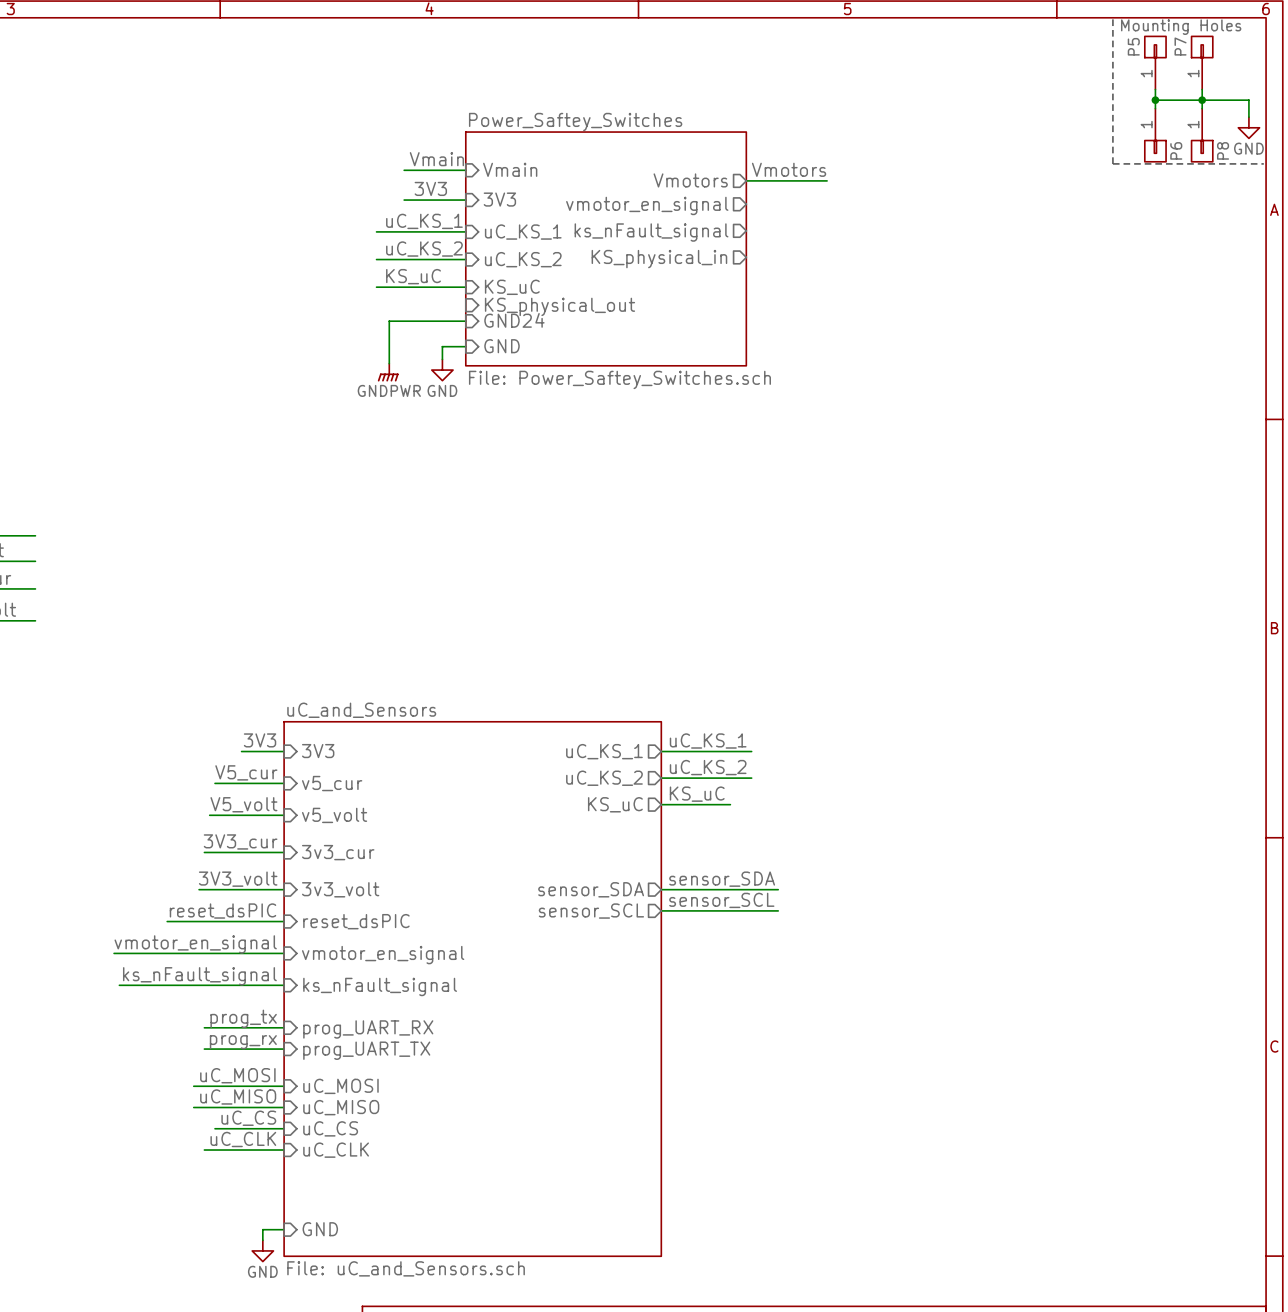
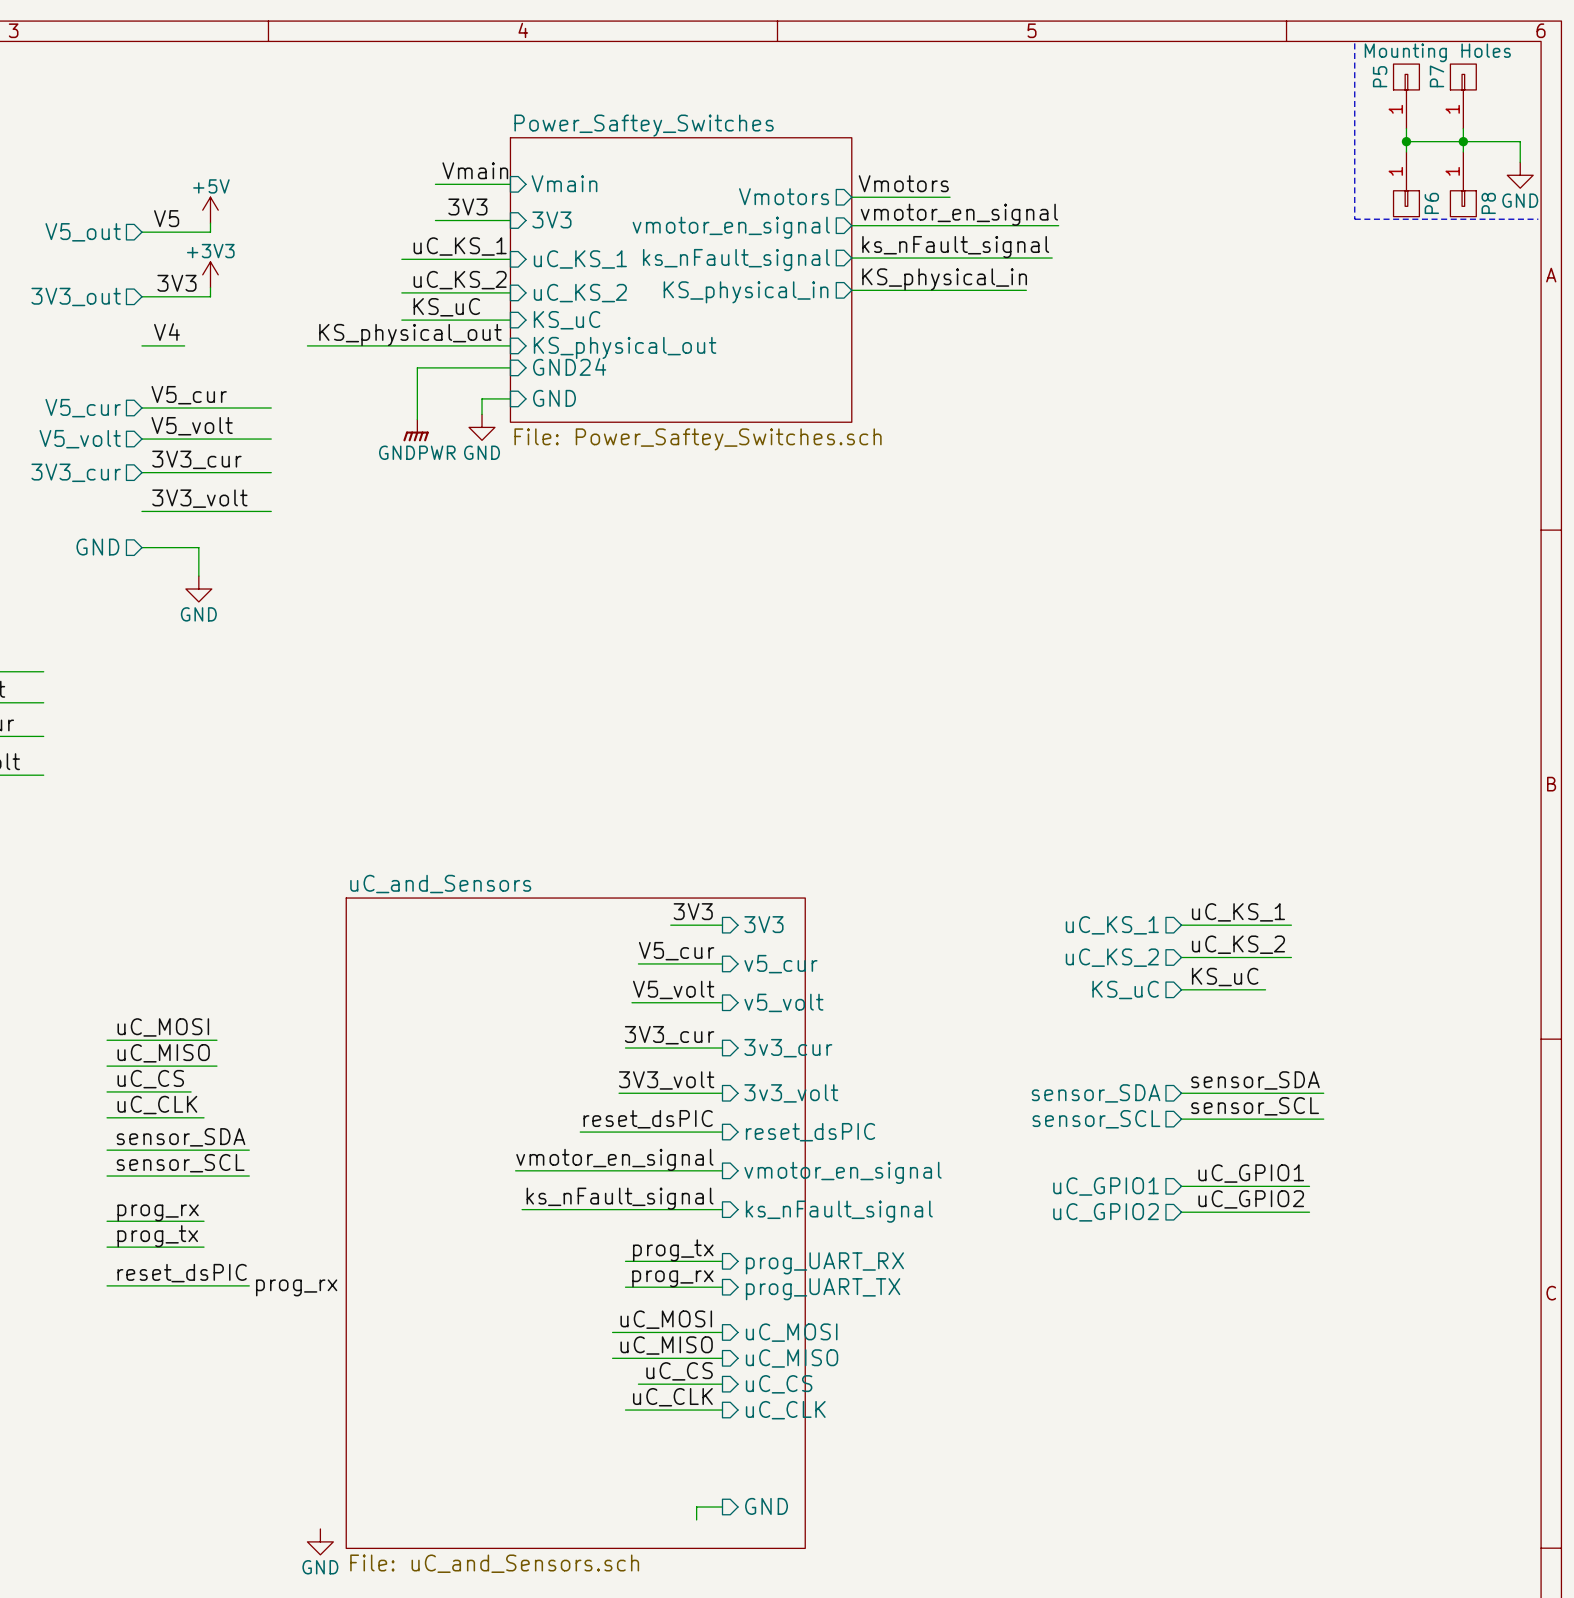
power symbol: none -> +5V (210, 210)
label position: Vmain (436, 159) -> Vmain (475, 170)
label: none -> vmotor_en_signal (959, 214)
label: none -> V5 (166, 218)
wire: none -> (210, 223) (210, 232) (141, 232)
sheet pin position: Vmain (510, 169) -> Vmain (564, 183)
wire: none -> (851, 225) (1058, 225)
label position: Vmotors (789, 169) -> Vmotors (903, 183)
wire: (404, 170) (465, 170) -> (435, 184) (510, 184)
sheet pin: none -> V5_out (83, 232)
sheet pin position: Vmotors (690, 180) -> Vmotors (784, 196)
wire: (746, 180) (827, 180) -> (851, 197) (950, 197)
label: none -> ks_nFault_signal (955, 247)
label position: 3V3 (430, 188) -> 3V3 (467, 206)
wire: none -> (851, 258) (1052, 258)
sheet pin position: 3V3 (499, 199) -> 3V3 (551, 219)
wire: (404, 200) (465, 200) -> (435, 220) (510, 220)
sheet pin position: vmotor_en_signal (647, 205) -> vmotor_en_signal (731, 227)
power symbol: none -> +3V3 (210, 274)
label: none -> KS_physical_in (944, 279)
label: none -> 3V3 (176, 283)
wire: none -> (210, 287) (210, 296) (141, 296)
label position: uC_KS_1 (424, 221) -> uC_KS_1 (460, 246)
wire: none -> (851, 290) (1026, 290)
sheet pin: none -> 3V3_out (76, 296)
wire: (376, 231) (465, 231) -> (401, 259) (510, 259)
sheet pin position: uC_KS_1 (523, 232) -> uC_KS_1 (580, 259)
sheet pin position: ks_nFault_signal (651, 232) -> ks_nFault_signal (736, 260)
sheet Power_Saftey_Switches position: (606, 248) -> (681, 279)
label position: uC_KS_2 (424, 249) -> uC_KS_2 (460, 280)
label: none -> V4 (166, 332)
label: none -> KS_physical_out (410, 334)
wire: (376, 259) (465, 259) -> (401, 292) (510, 292)
sheet pin position: uC_KS_2 (523, 259) -> uC_KS_2 (580, 293)
sheet pin position: KS_physical_in (659, 259) -> KS_physical_in (746, 292)
wire: none -> (141, 345) (184, 345)
wire: none -> (307, 345) (510, 345)
label position: KS_uC (413, 276) -> KS_uC (446, 307)
wire: (376, 287) (465, 287) -> (401, 320) (510, 320)
sheet pin position: KS_uC (512, 287) -> KS_uC (567, 320)
sheet pin position: KS_physical_out (559, 306) -> KS_physical_out (625, 347)
label: none -> V5_cur (189, 395)
sheet pin: none -> V5_cur (83, 408)
wire: none -> (141, 408) (271, 408)
sheet pin position: GND24 (514, 320) -> GND24 (569, 366)
wire: (465, 321) (389, 321) (389, 363) -> (510, 367) (417, 367) (417, 419)
label: none -> V5_volt (192, 426)
sheet pin: none -> V5_volt (80, 439)
wire: none -> (141, 439) (271, 439)
wire: (465, 346) (442, 346) (442, 359) -> (510, 398) (482, 398) (482, 414)
sheet pin position: GND (502, 346) -> GND (554, 398)
label: none -> 3V3_cur (196, 459)
power symbol position: GND (442, 370) -> GND (482, 427)
sheet pin: none -> 3V3_cur (76, 472)
wire: none -> (141, 472) (271, 472)
power symbol position: GNDPWR (388, 372) -> GNDPWR (416, 430)
label: none -> 3V3_volt (199, 498)
wire: none -> (141, 511) (271, 511)
sheet pin: none -> GND (97, 547)
wire: none -> (141, 547) (198, 547) (198, 576)
power symbol: none -> GND (198, 589)
label: none -> 3V3 (693, 911)
label: none -> uC_KS_1 (1238, 912)
label: 3V3 (260, 740) -> none
label: uC_KS_1 (708, 741) -> none
sheet pin: none -> 3V3 (763, 924)
wire: none -> (670, 925) (722, 925)
sheet pin: none -> uC_KS_1 (1112, 925)
wire: none -> (1181, 925) (1291, 925)
wire: (241, 751) (284, 751) -> none
sheet pin: 3V3 (318, 751) -> none
sheet pin: uC_KS_1 (604, 751) -> none
wire: (661, 751) (751, 751) -> none
label: none -> uC_KS_2 (1238, 944)
label: none -> V5_cur (676, 951)
label: uC_KS_2 (708, 767) -> none
sheet pin: none -> uC_KS_2 (1112, 957)
wire: none -> (1181, 957) (1291, 957)
label: V5_cur (246, 772) -> none
sheet pin: none -> v5_cur (780, 964)
sheet pin: uC_KS_2 (604, 778) -> none
wire: (661, 778) (751, 778) -> none
wire: (215, 783) (284, 783) -> (107, 1091) (191, 1091)
sheet pin: v5_cur (332, 783) -> none
label: none -> KS_uC (1225, 977)
label: KS_uC (697, 794) -> none
label: none -> V5_volt (673, 989)
sheet pin: none -> KS_uC (1125, 989)
wire: none -> (1181, 989) (1265, 989)
label: V5_volt (243, 804) -> none
sheet pin: KS_uC (615, 804) -> none
wire: (661, 804) (730, 804) -> (638, 963) (722, 963)
wire: none -> (631, 1002) (722, 1002)
sheet pin: none -> v5_volt (783, 1002)
wire: (209, 815) (284, 815) -> none
sheet pin: v5_volt (334, 815) -> none
label: none -> uC_MOSI (163, 1027)
label: none -> 3V3_cur (669, 1035)
wire: none -> (107, 1040) (216, 1040)
label: 3V3_cur (240, 841) -> none
wire: none -> (625, 1048) (722, 1048)
sheet pin: none -> 3v3_cur (788, 1048)
label: none -> uC_MISO (163, 1053)
wire: (204, 852) (284, 852) -> (107, 1117) (204, 1117)
sheet pin: 3v3_cur (338, 852) -> none
wire: none -> (107, 1066) (216, 1066)
label: none -> uC_CS (150, 1079)
label: none -> 3V3_volt (666, 1080)
label: none -> sensor_SDA (1255, 1080)
label: 3V3_volt (238, 879) -> none
label: sensor_SDA (722, 879) -> none
wire: none -> (619, 1093) (722, 1093)
sheet pin: none -> 3v3_volt (791, 1093)
sheet pin: none -> sensor_SDA (1096, 1093)
wire: none -> (1181, 1093) (1323, 1093)
wire: (199, 889) (284, 889) -> none
sheet pin: 3v3_volt (340, 889) -> none
sheet pin: sensor_SDA (591, 889) -> none
wire: (661, 889) (778, 889) -> none
label: none -> uC_CLK (157, 1105)
label: none -> sensor_SCL (1255, 1106)
label: sensor_SCL (721, 900) -> none
label: none -> reset_dsPIC (648, 1119)
sheet pin: none -> sensor_SCL (1096, 1119)
wire: none -> (1181, 1119) (1323, 1119)
wire: (661, 910) (778, 910) -> (580, 1132) (722, 1132)
label: reset_dsPIC (222, 911) -> none
sheet pin: sensor_SCL (591, 911) -> none
sheet pin: none -> reset_dsPIC (810, 1132)
label: none -> sensor_SDA (181, 1137)
wire: (167, 921) (284, 921) -> (107, 1150) (249, 1150)
sheet pin: reset_dsPIC (356, 921) -> none
label: none -> vmotor_en_signal (614, 1159)
label: none -> sensor_SCL (180, 1163)
label: vmotor_en_signal (195, 944) -> none
wire: none -> (515, 1170) (722, 1170)
sheet pin: none -> vmotor_en_signal (843, 1172)
label: none -> uC_GPIO1 (1251, 1173)
wire: none -> (107, 1176) (249, 1176)
wire: (114, 953) (284, 953) -> none
sheet pin: vmotor_en_signal (383, 955) -> none
sheet pin: none -> uC_GPIO1 (1106, 1186)
wire: none -> (1181, 1186) (1309, 1186)
label: none -> ks_nFault_signal (620, 1198)
label: none -> uC_GPIO2 (1251, 1199)
label: ks_nFault_signal (199, 976) -> none
wire: none -> (522, 1209) (722, 1209)
sheet pin: none -> ks_nFault_signal (839, 1211)
wire: none -> (1181, 1212) (1309, 1212)
label: none -> prog_rx (158, 1212)
sheet pin: none -> uC_GPIO2 (1106, 1212)
wire: (119, 985) (284, 985) -> none
sheet pin: ks_nFault_signal (380, 986) -> none
label: none -> prog_tx (157, 1236)
label: none -> prog_tx (673, 1250)
label: prog_tx (243, 1018) -> none
wire: none -> (625, 1261) (722, 1261)
sheet pin: none -> prog_UART_RX (824, 1263)
wire: (204, 1027) (284, 1027) -> (107, 1221) (204, 1221)
sheet pin: prog_UART_RX (368, 1029) -> none
label: none -> reset_dsPIC (182, 1273)
label: none -> prog_rx (672, 1278)
wire: none -> (107, 1285) (249, 1285)
wire: none -> (625, 1287) (722, 1287)
sheet pin: none -> prog_UART_TX (823, 1289)
wire: (204, 1049) (284, 1049) -> (107, 1247) (204, 1247)
sheet pin: prog_UART_TX (366, 1050) -> none
label: none -> uC_MOSI (666, 1319)
label: uC_MOSI (237, 1075) -> none
wire: none -> (612, 1332) (722, 1332)
sheet pin: none -> uC_MOSI (791, 1332)
wire: (193, 1086) (284, 1086) -> none
sheet pin: uC_MOSI (340, 1086) -> none
label: none -> uC_MISO (666, 1345)
label: uC_MISO (238, 1096) -> none
wire: none -> (612, 1358) (722, 1358)
sheet pin: none -> uC_MISO (792, 1358)
wire: (193, 1107) (284, 1107) -> none
sheet pin: uC_MISO (341, 1107) -> none
label: none -> uC_CS (679, 1371)
label: uC_CS (248, 1118) -> none
wire: none -> (638, 1384) (722, 1384)
sheet pin: none -> uC_CS (779, 1384)
wire: (215, 1128) (284, 1128) -> none
sheet pin: uC_CS (330, 1128) -> none
label: none -> uC_CLK (672, 1397)
label: uC_CLK (243, 1139) -> none
wire: none -> (625, 1410) (722, 1410)
sheet pin: none -> uC_CLK (785, 1410)
wire: (204, 1150) (284, 1150) -> none
sheet pin: uC_CLK (336, 1150) -> none
sheet pin: none -> GND (766, 1506)
wire: none -> (722, 1507) (696, 1507) (696, 1519)
wire: (284, 1229) (262, 1229) (262, 1240) -> none
sheet pin: GND (320, 1229) -> none

